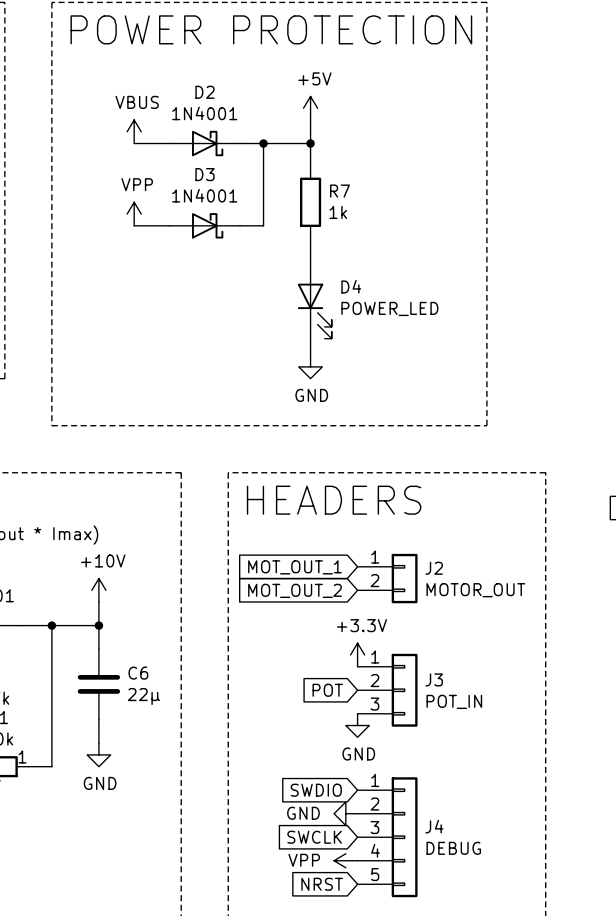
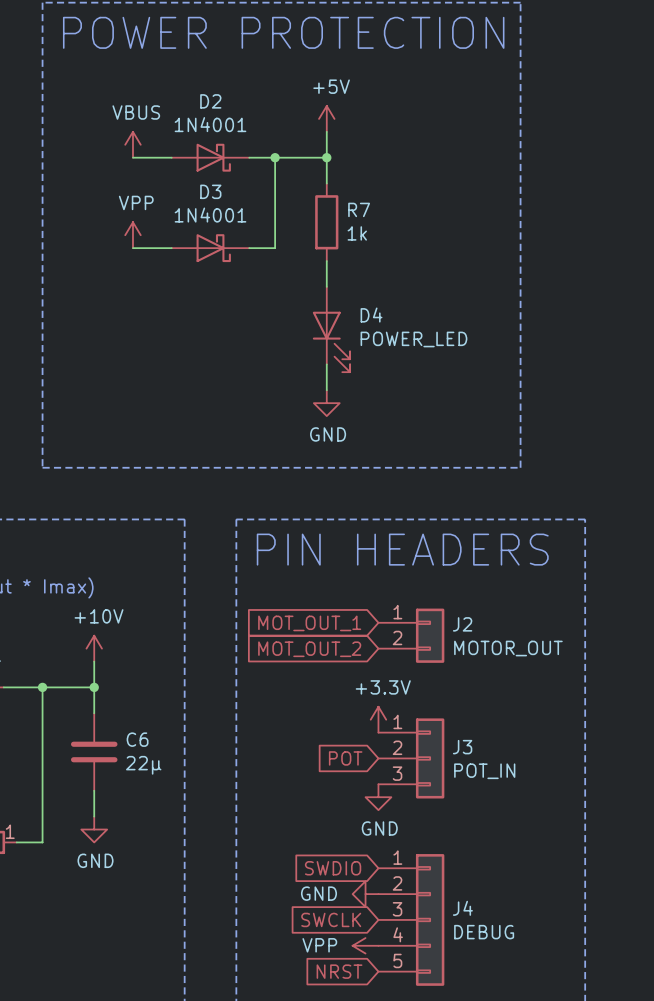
text: HEADERS (334, 500) -> PIN HEADERS (402, 549)

